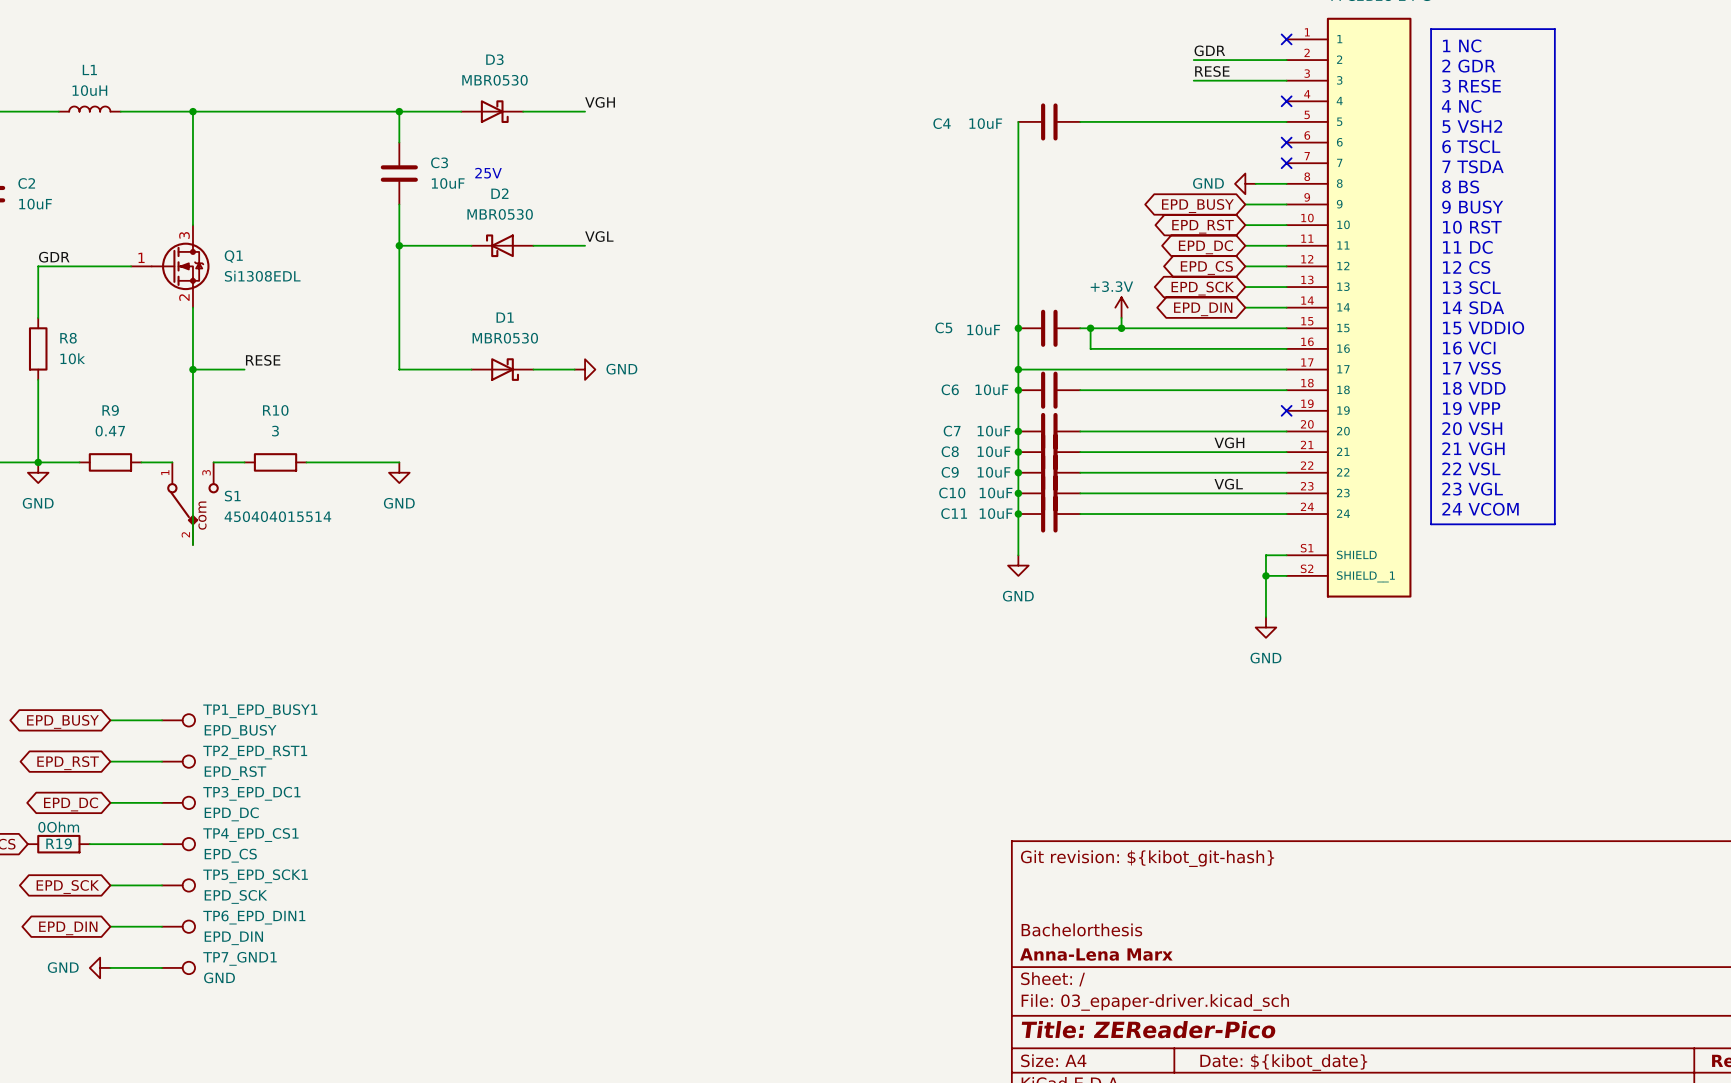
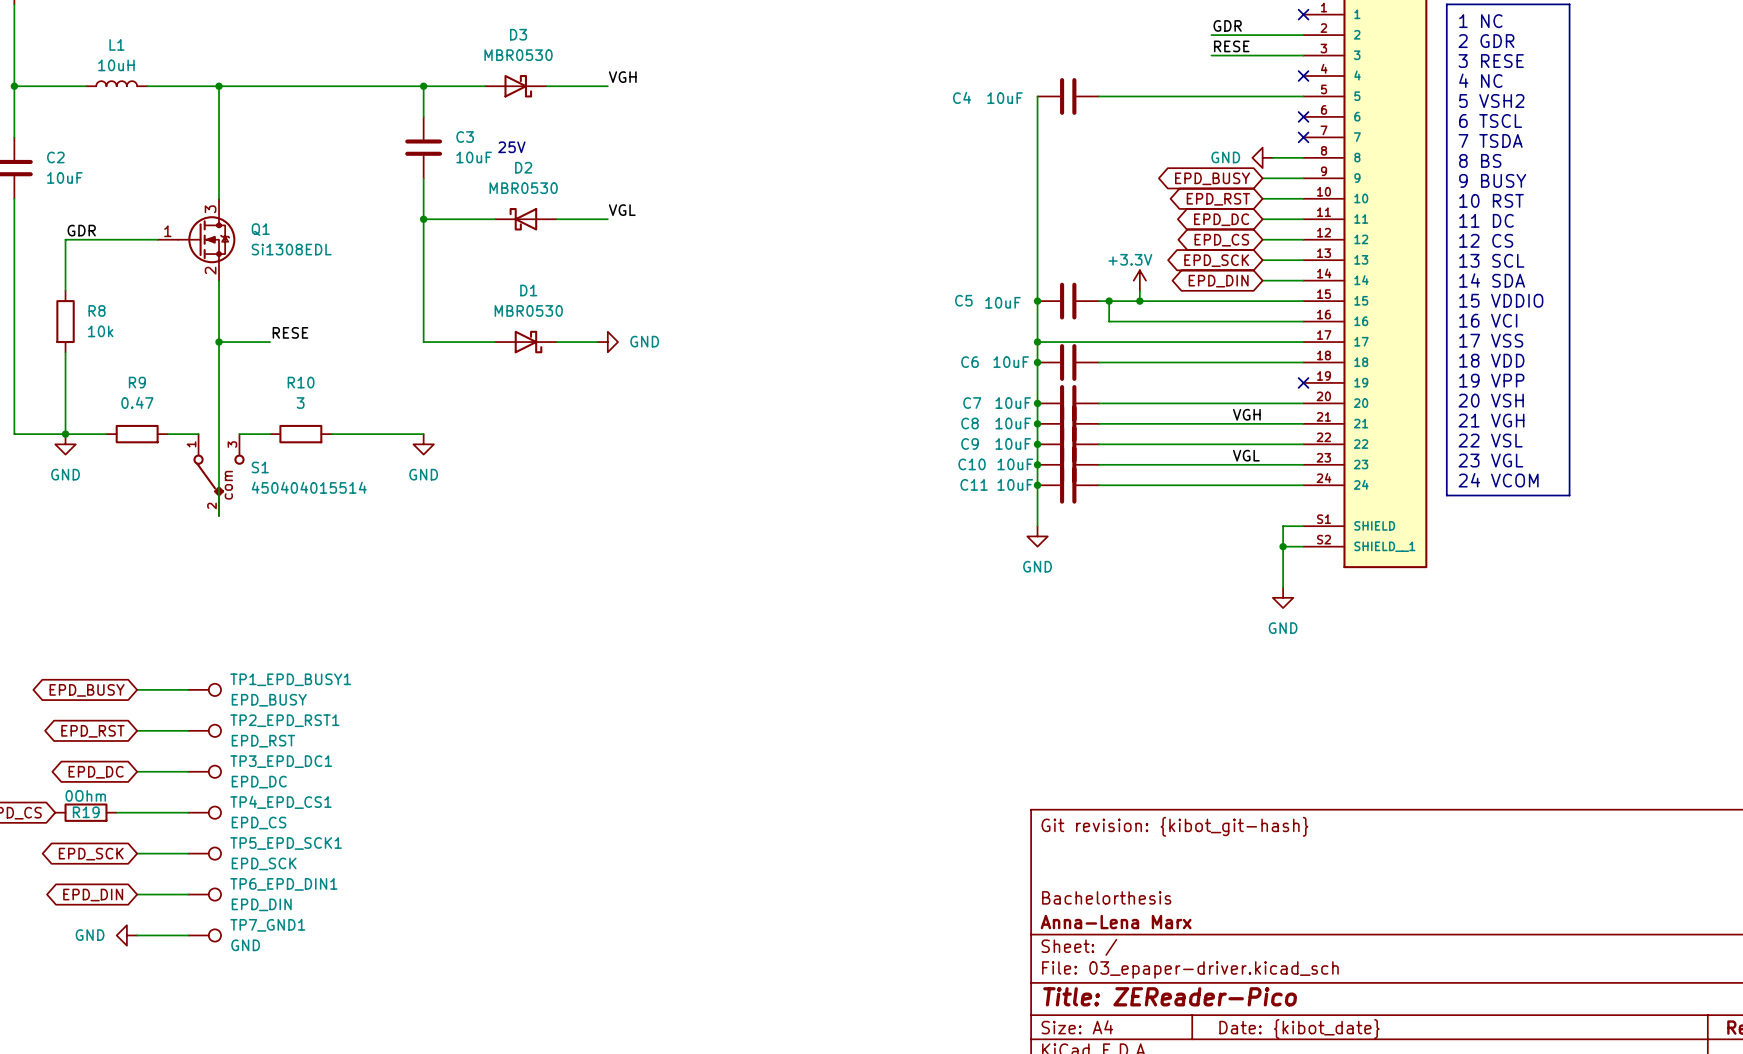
title block: Git revision: ${kibot_git-hash} (1147, 858) -> Git revision: {kibot_git-hash} (1174, 826)
title block: Date: ${kibot_date} (1283, 1062) -> Date: {kibot_date} (1299, 1029)

